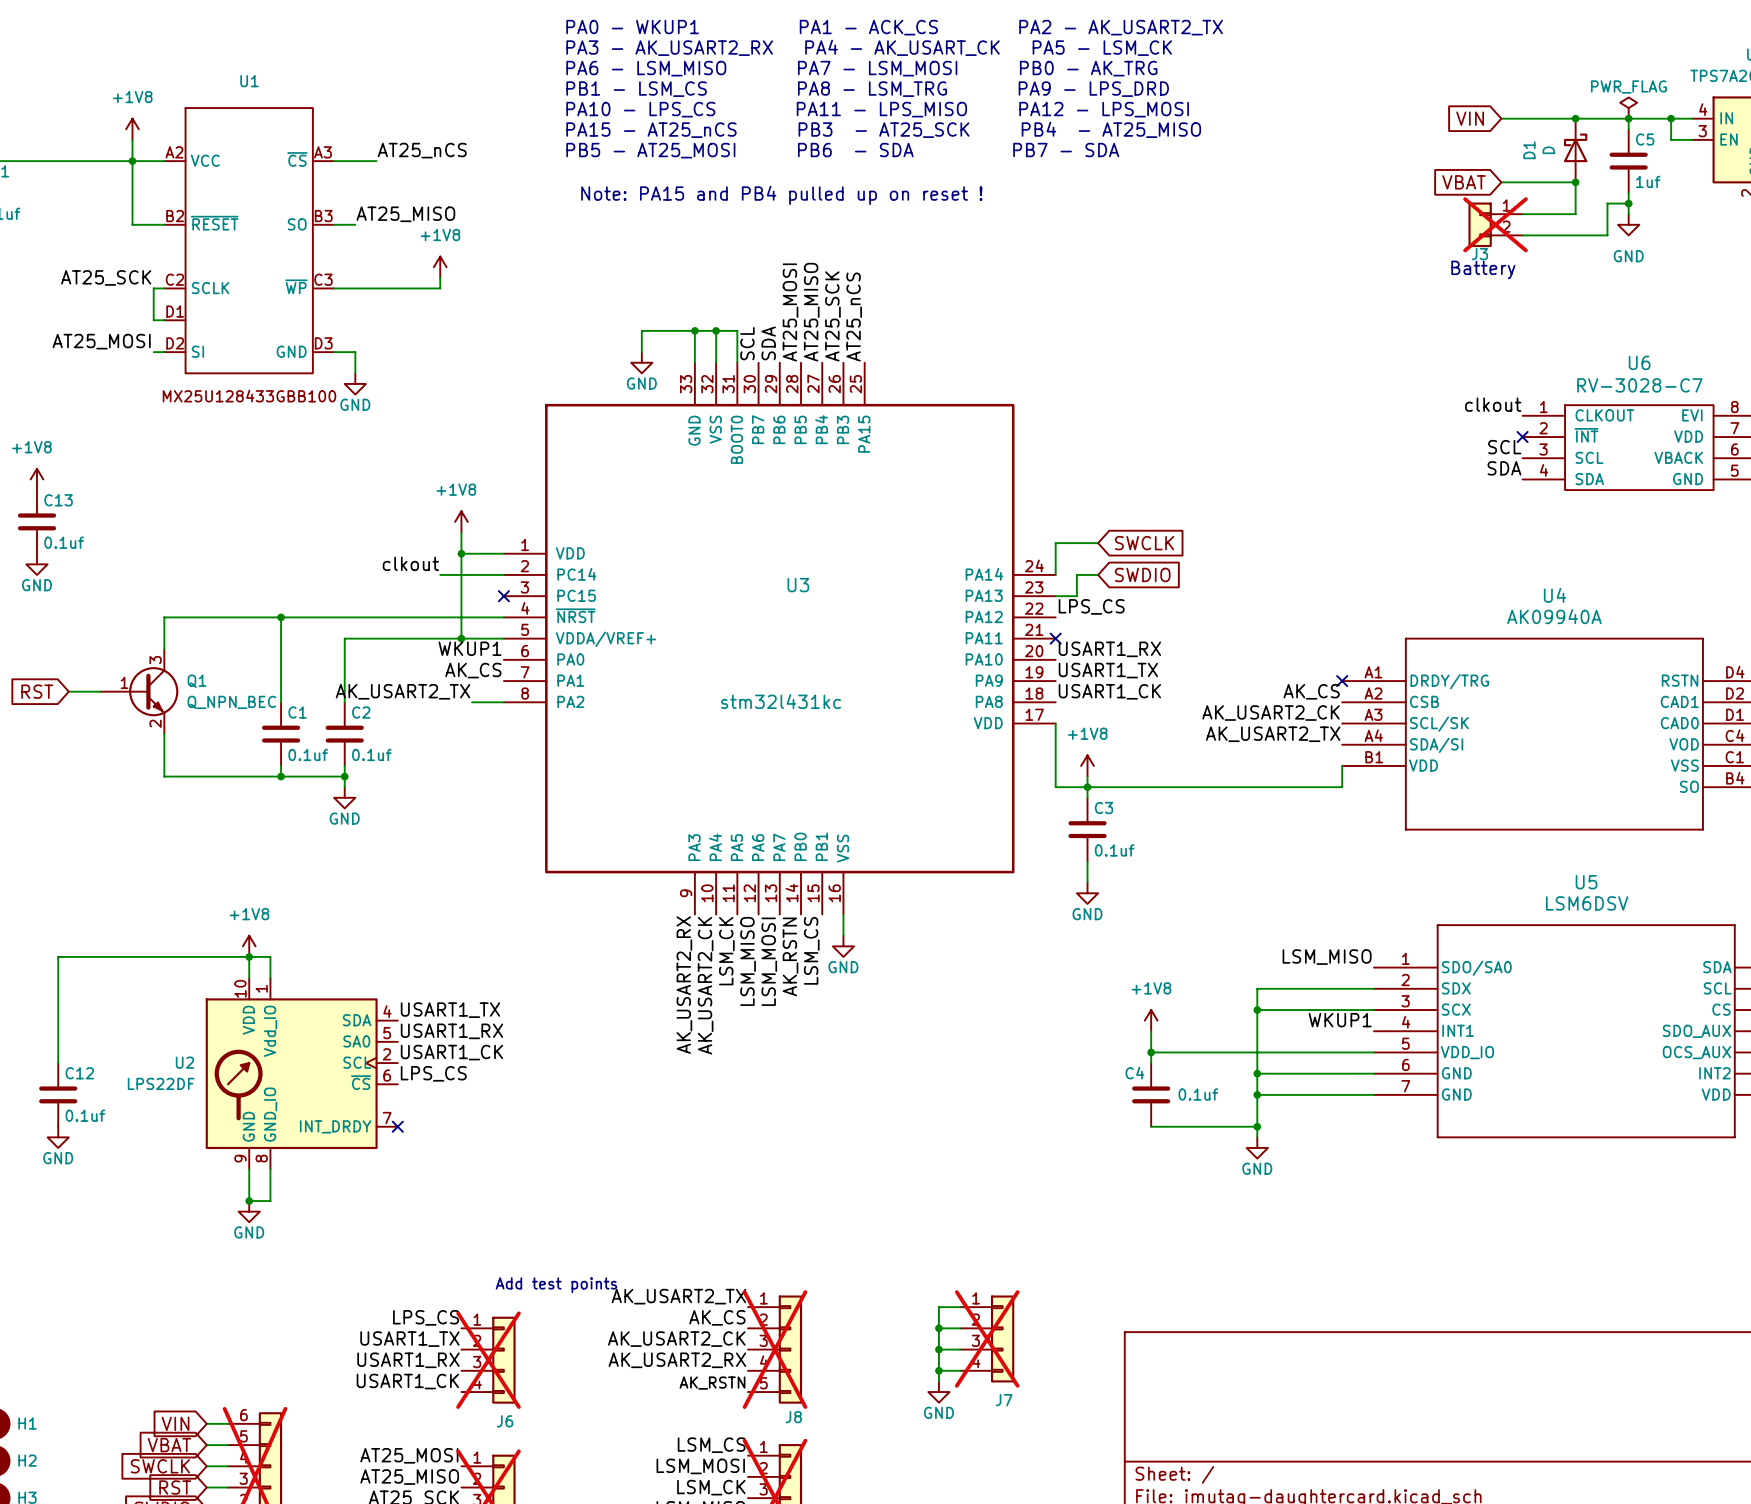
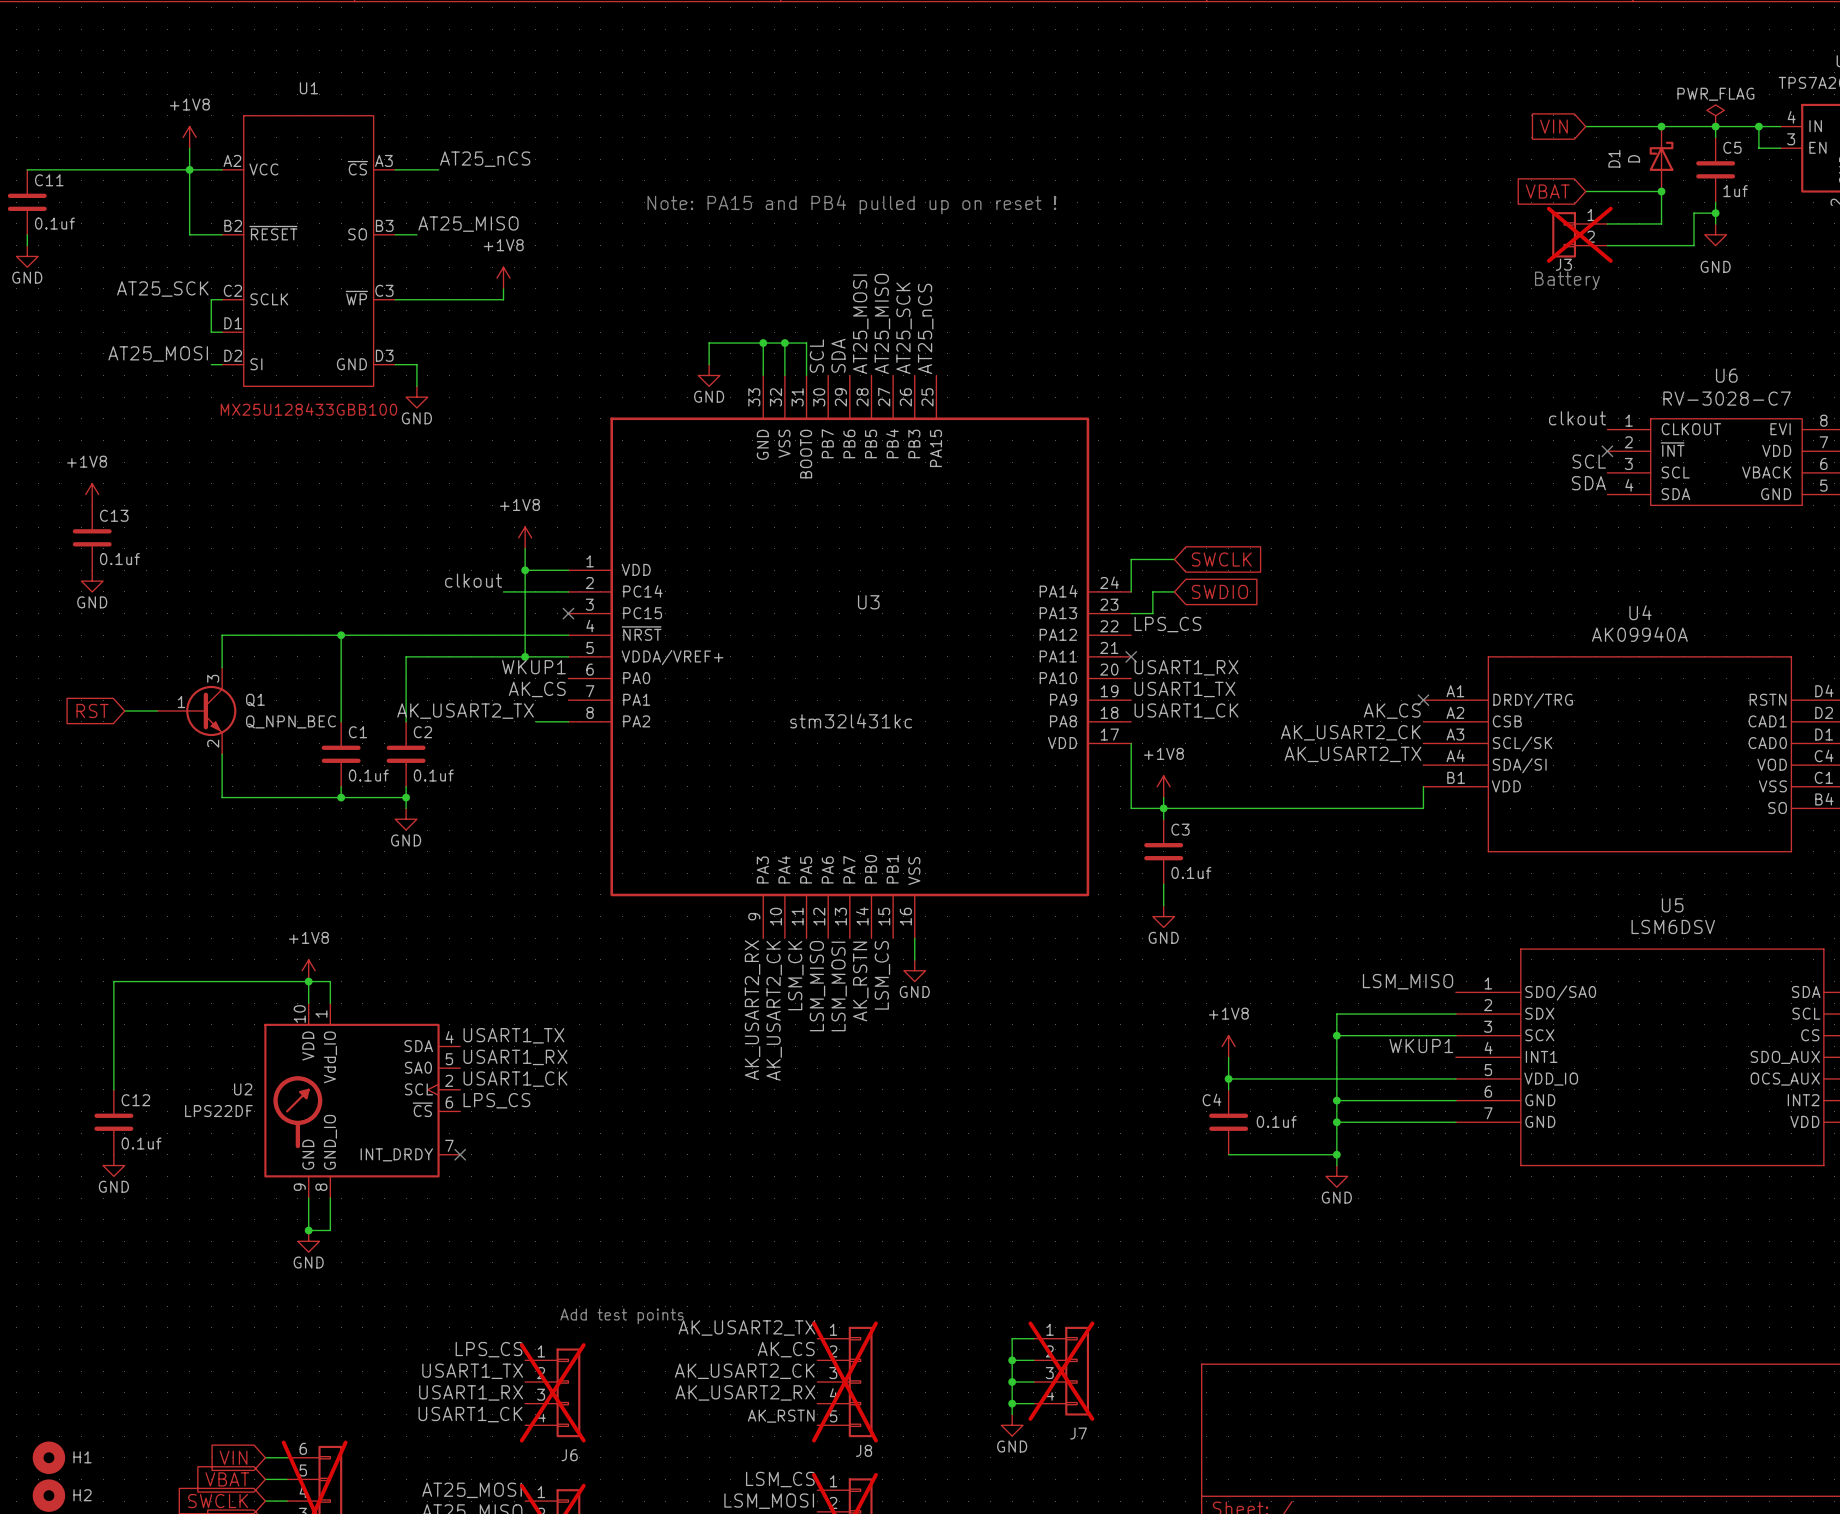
text: PA0 - WKUP1 PA1 - ACK_CS PA2 - AK_USART2_TX (894, 27) -> none
text: PA3 - AK_USART2_RX PA4 - AK_USART_CK PA5 - LSM_CK (869, 47) -> none
text: PA6 - LSM_MISO PA7 - LSM_MOSI PB0 - AK_TRG (861, 68) -> none
text: PB1 - LSM_CS PA8 - LSM_TRG PA9 - LPS_DRD (867, 89) -> none
text: PA10 - LPS_CS PA11 - LPS_MISO PA12 - LPS_MOSI (877, 109) -> none
text: PA15 - AT25_nCS PB3 - AT25_SCK PB4 - AT25_MISO (883, 129) -> none
text: PB5 - AT25_MOSI PB6 - SDA PB7 - SDA (842, 150) -> none

